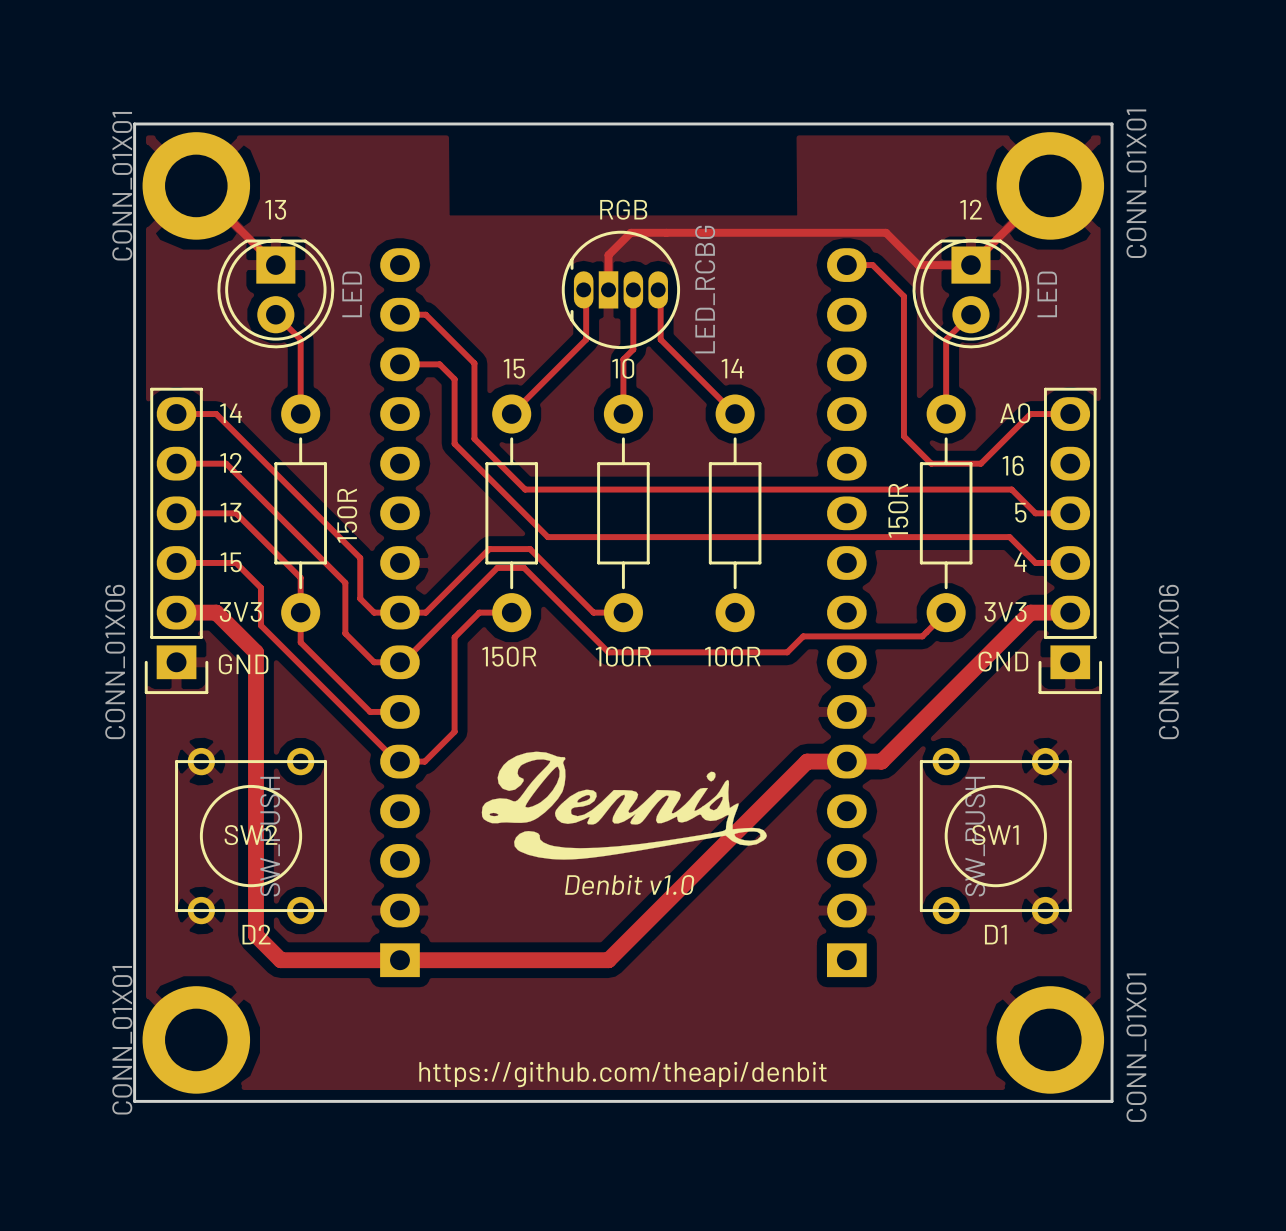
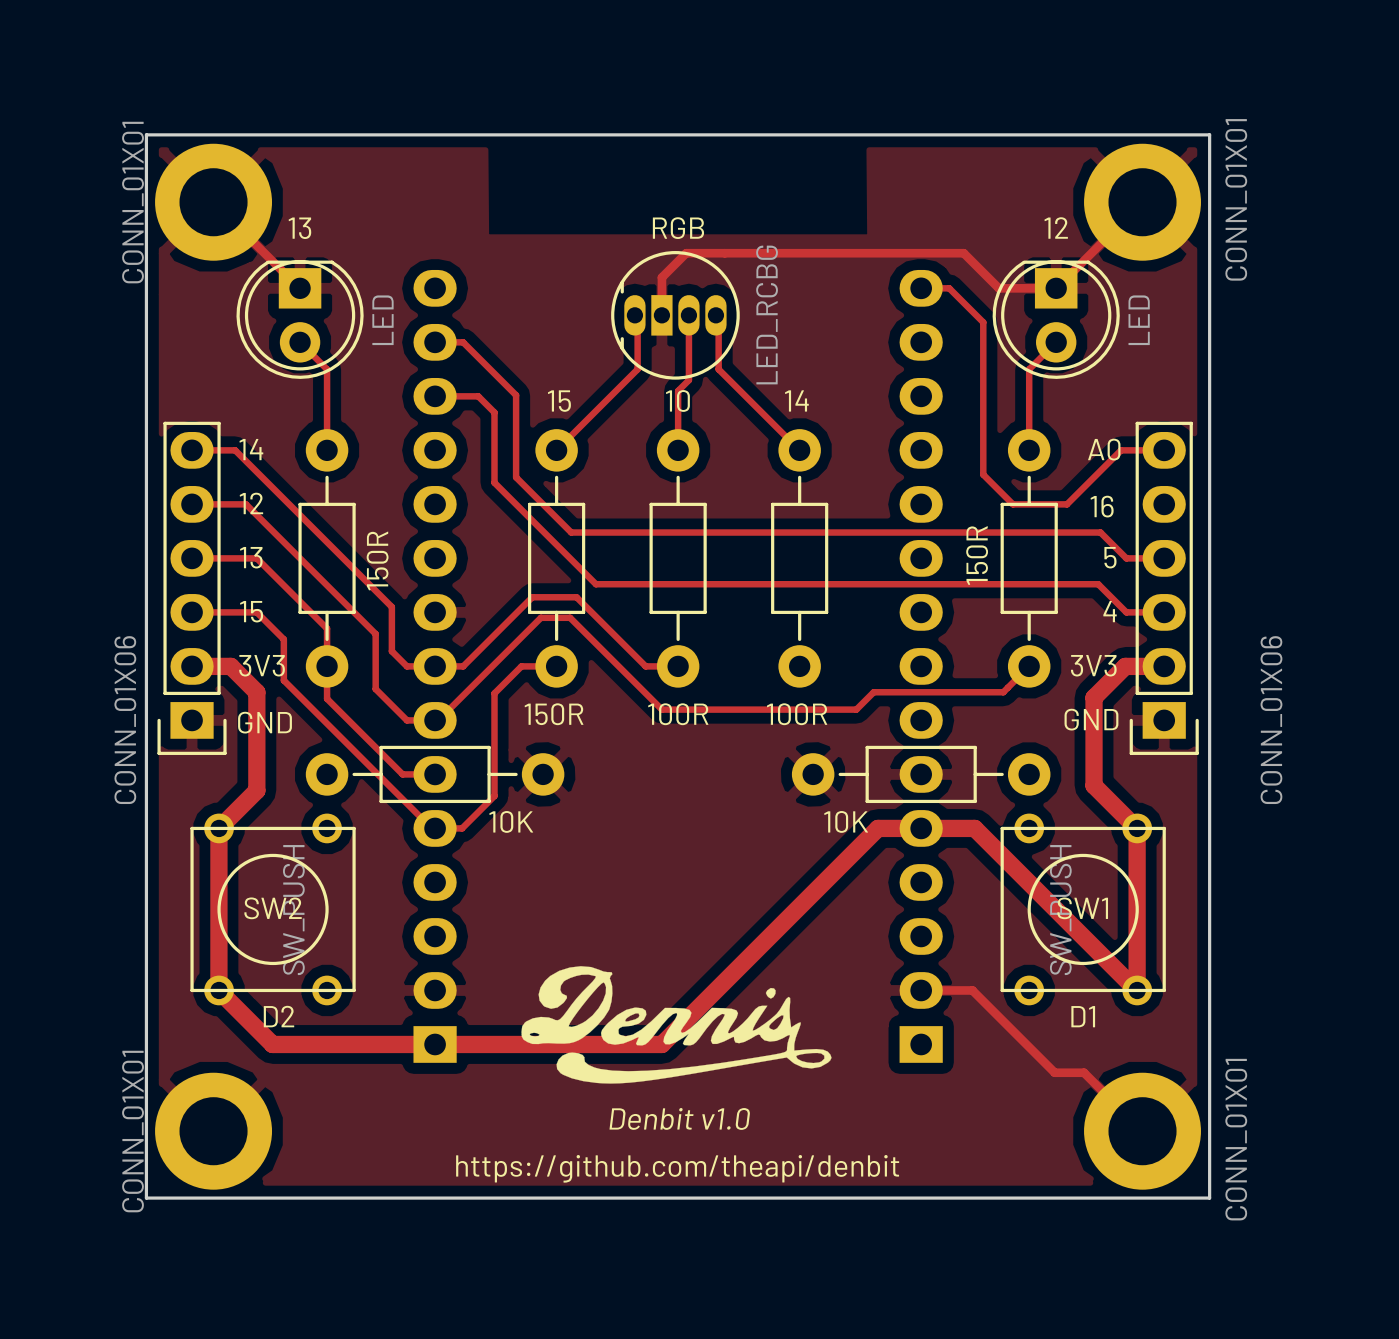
track: (212, 612) (216, 612) (255, 652) (255, 935) (280, 960) -> (218, 828) (218, 990) (272, 1044) (305, 1044)
track: none -> (230, 666) (256, 692) (256, 790) (219, 828)
track: (1034, 612) (1030, 612) (881, 761) -> (1125, 666) (1094, 697) (1094, 785) (1137, 828) (1137, 990) (974, 828) (958, 828)
part: none -> 10K (435, 774)
part: none -> 10K (921, 774)
drawing position: (624, 805) -> (676, 1024)
text position: Denbit v1.0 (629, 884) -> Denbit v1.0 (679, 1118)
track: none -> (921, 990) (972, 990) (1054, 1072) (1084, 1072) (1142, 1131)

